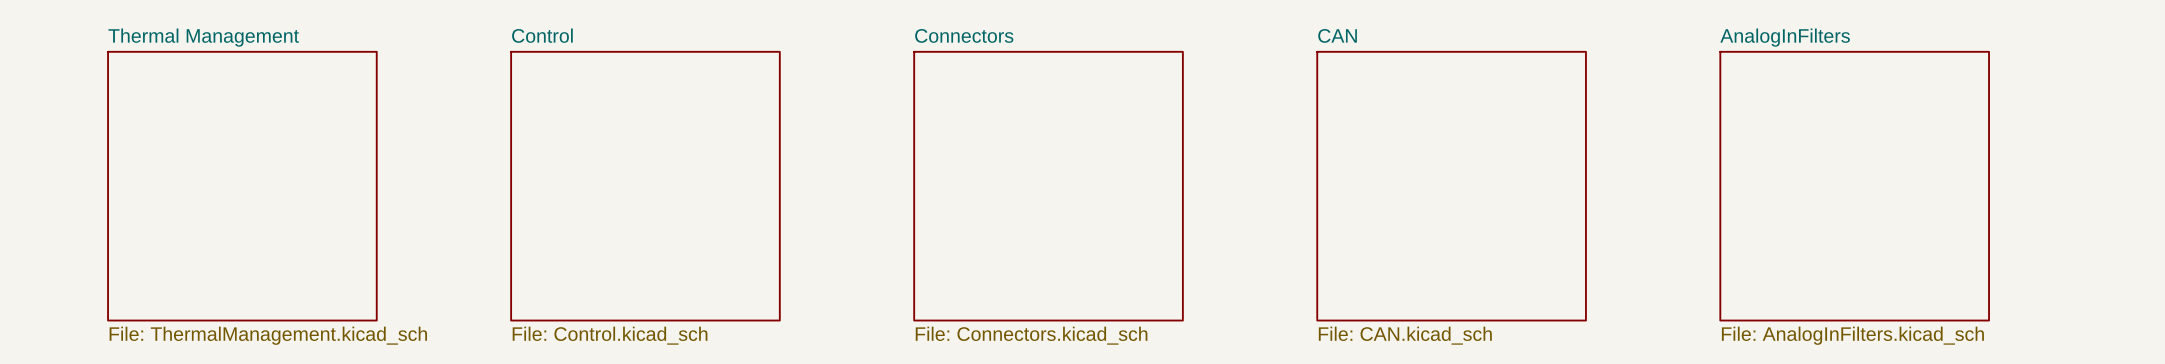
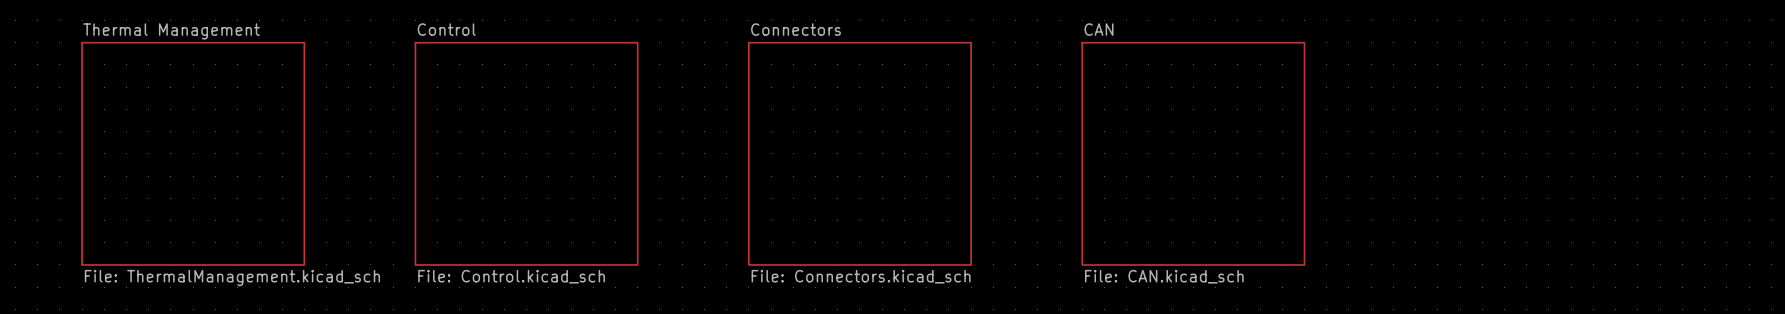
sheet AnalogInFilters: File: AnalogInFilters.kicad_sch (1854, 186) -> none

